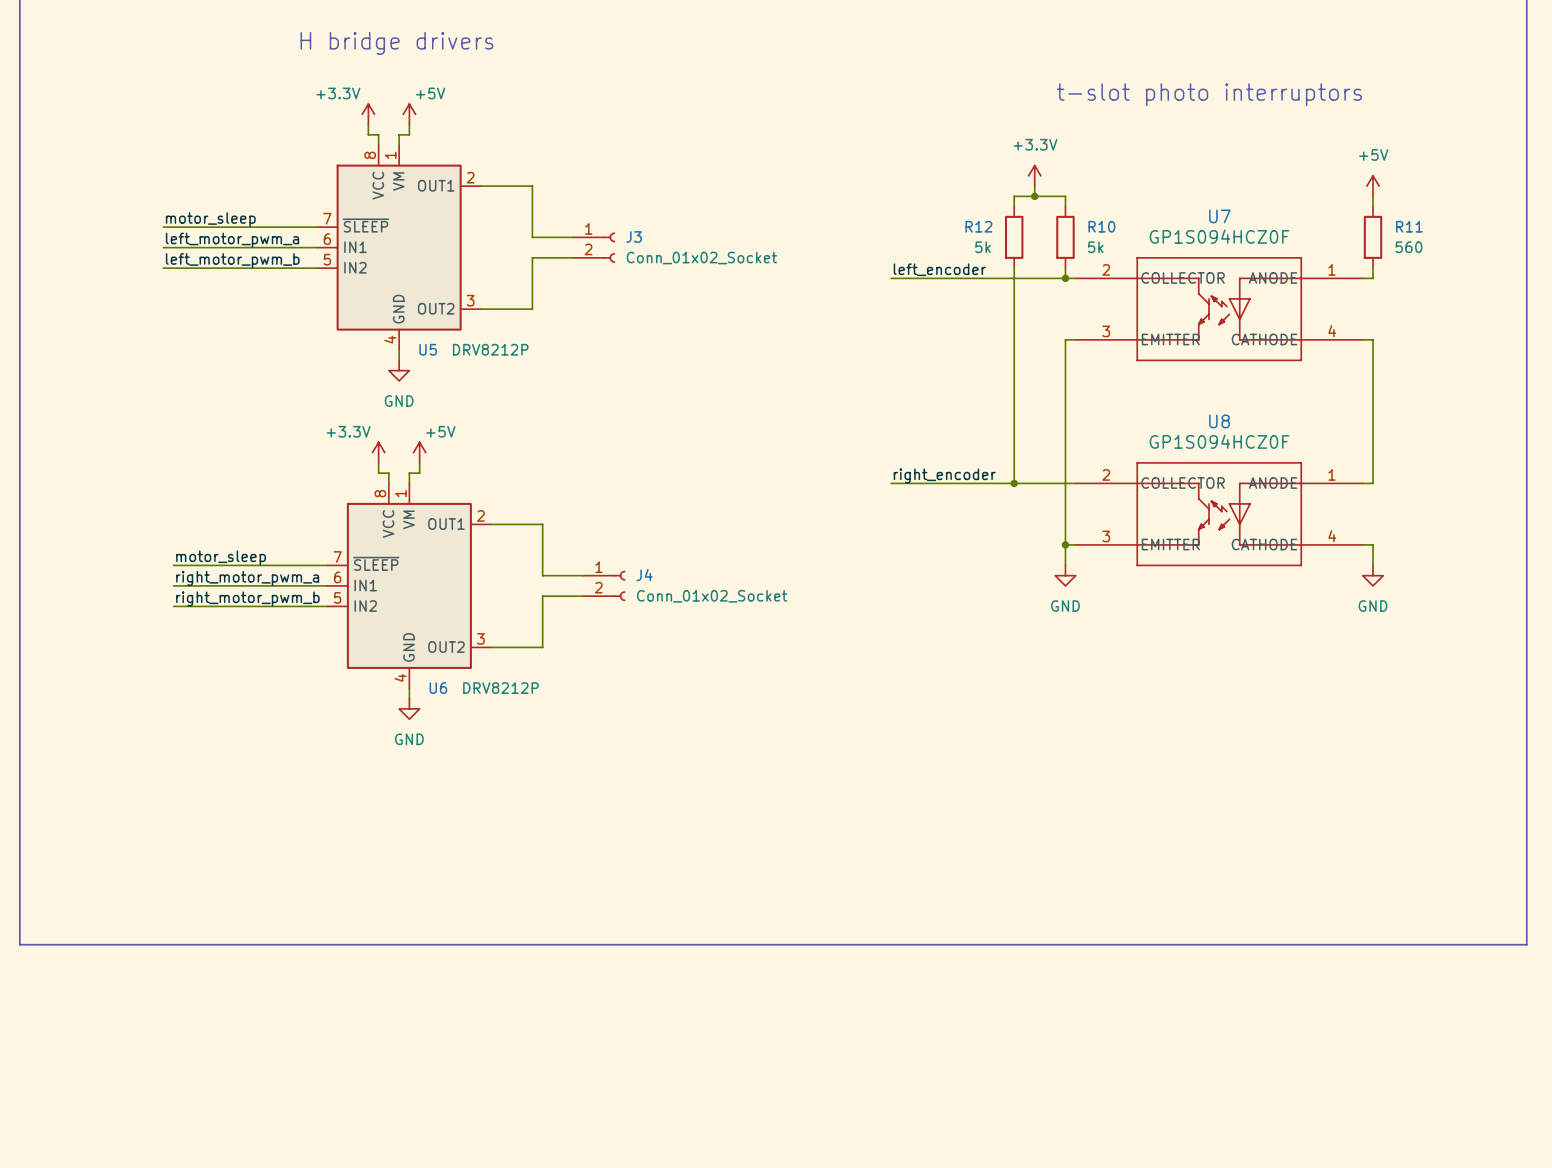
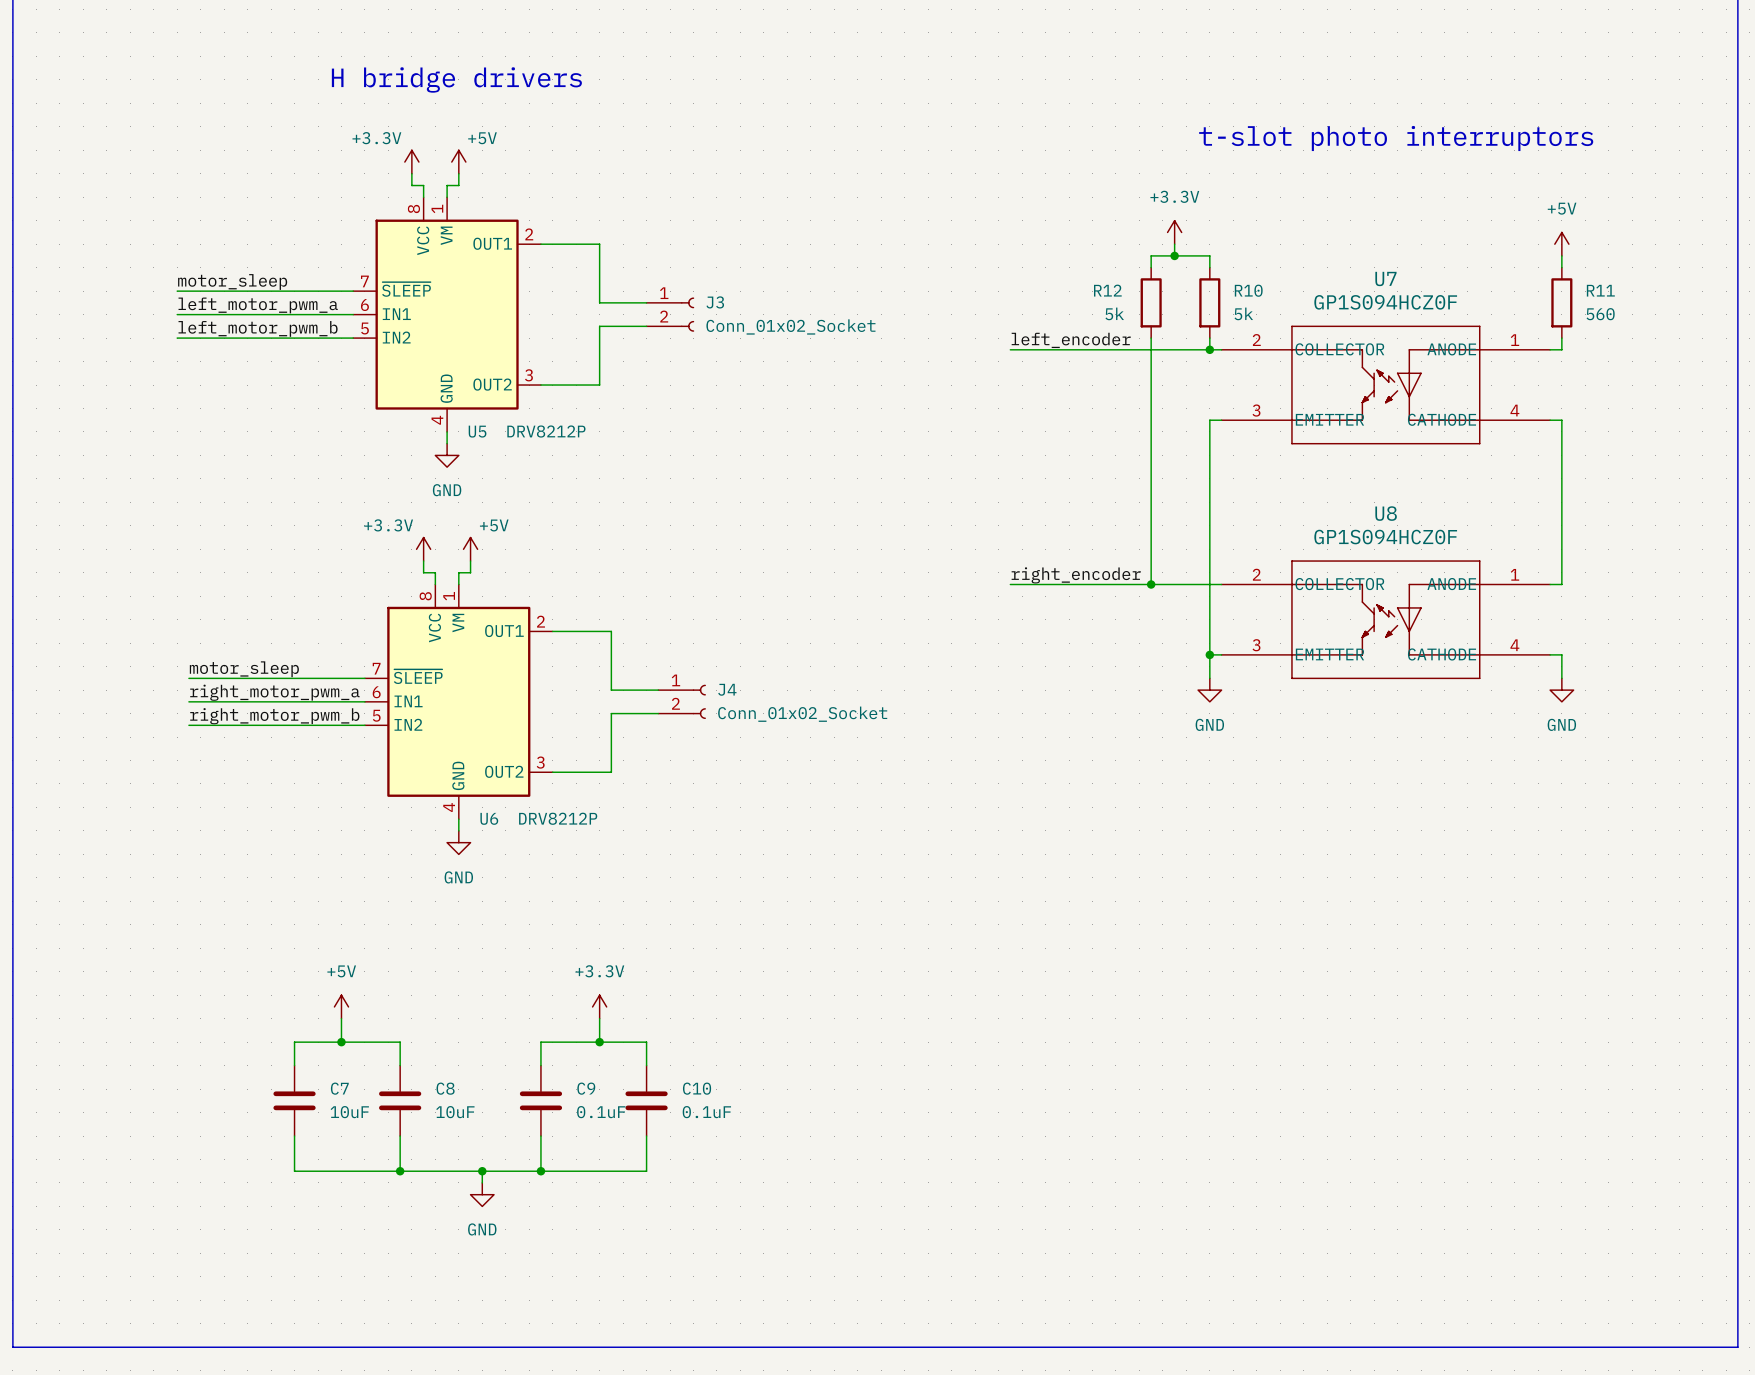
power symbol: none -> +5V (341, 1006)
power symbol: none -> +3.3V (599, 1006)
wire: none -> (341, 1018) (341, 1042)
wire: none -> (599, 1018) (599, 1042)
junction: none -> (341, 1042)
junction: none -> (599, 1042)
wire: none -> (294, 1065) (294, 1042) (400, 1042) (400, 1065)
wire: none -> (540, 1065) (540, 1042) (646, 1042) (646, 1065)
C7: none -> 10uF (294, 1100)
C8: none -> 10uF (400, 1100)
C9: none -> 0.1uF (540, 1100)
C10: none -> 0.1uF (646, 1100)
line: (19, 944) (1526, 944) -> (12, 1112) (12, 1347) (1737, 1347) (1737, 1112)
wire: none -> (294, 1136) (294, 1171) (646, 1171) (646, 1136)
wire: none -> (400, 1136) (400, 1171)
wire: none -> (540, 1136) (540, 1171)
junction: none -> (400, 1171)
wire: none -> (482, 1171) (482, 1182)
junction: none -> (482, 1171)
junction: none -> (540, 1171)
power symbol: none -> GND (482, 1194)

